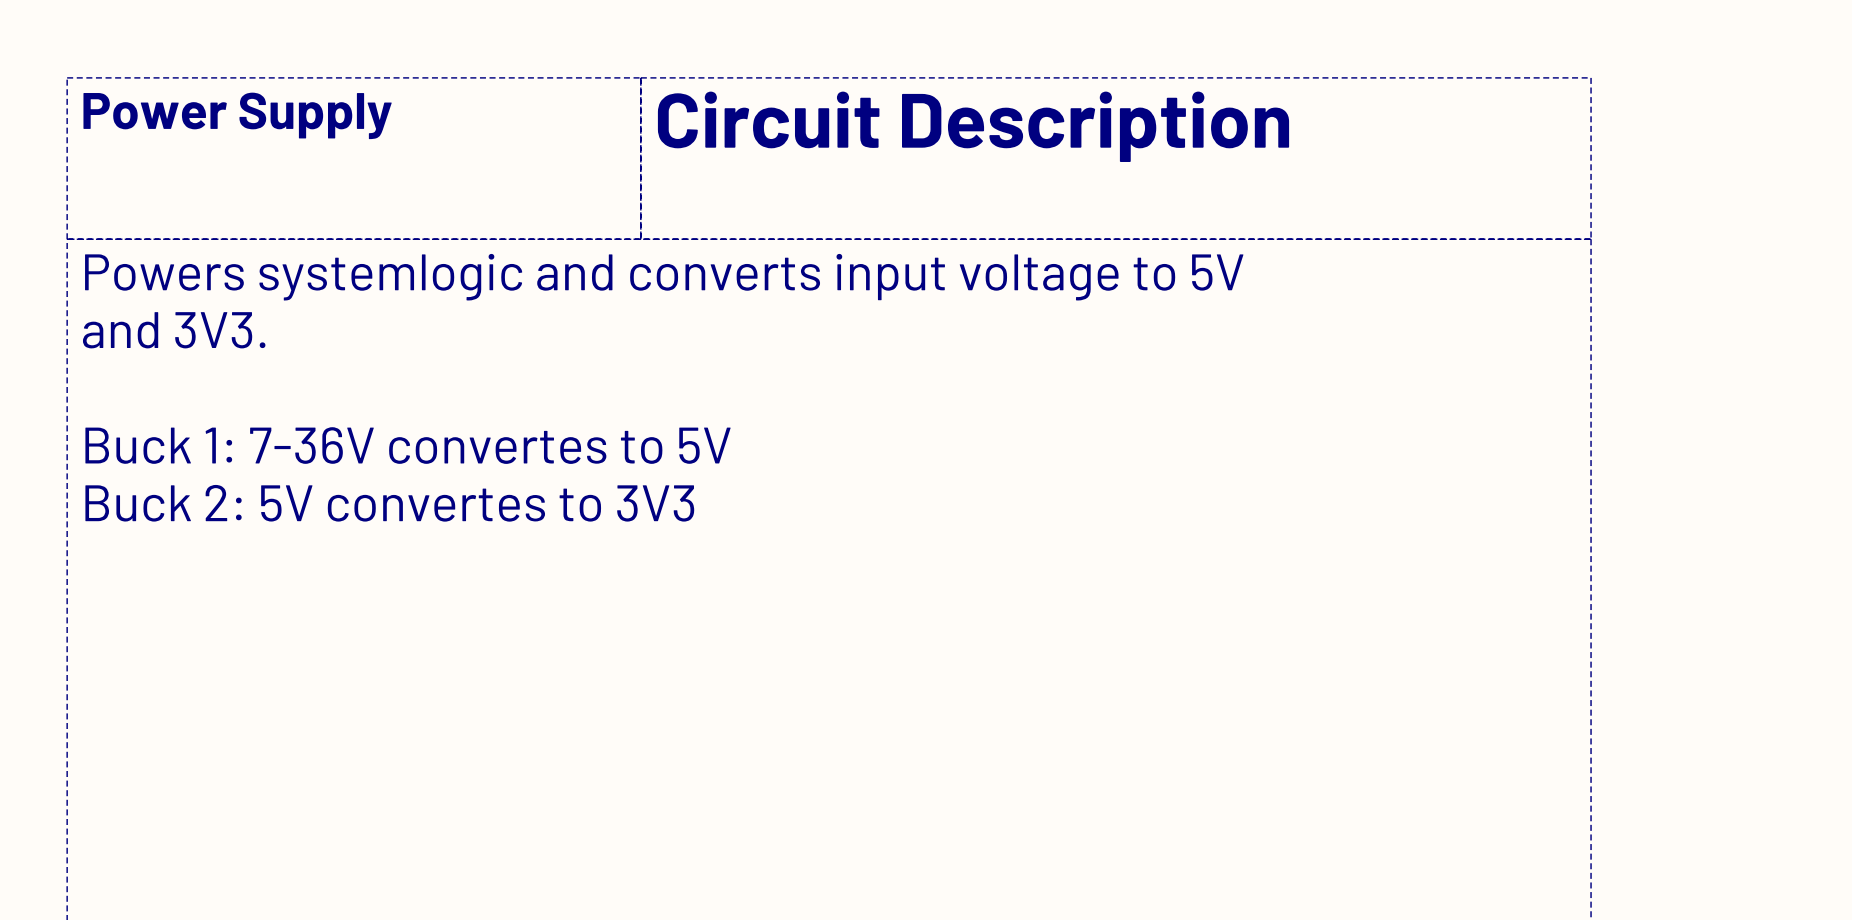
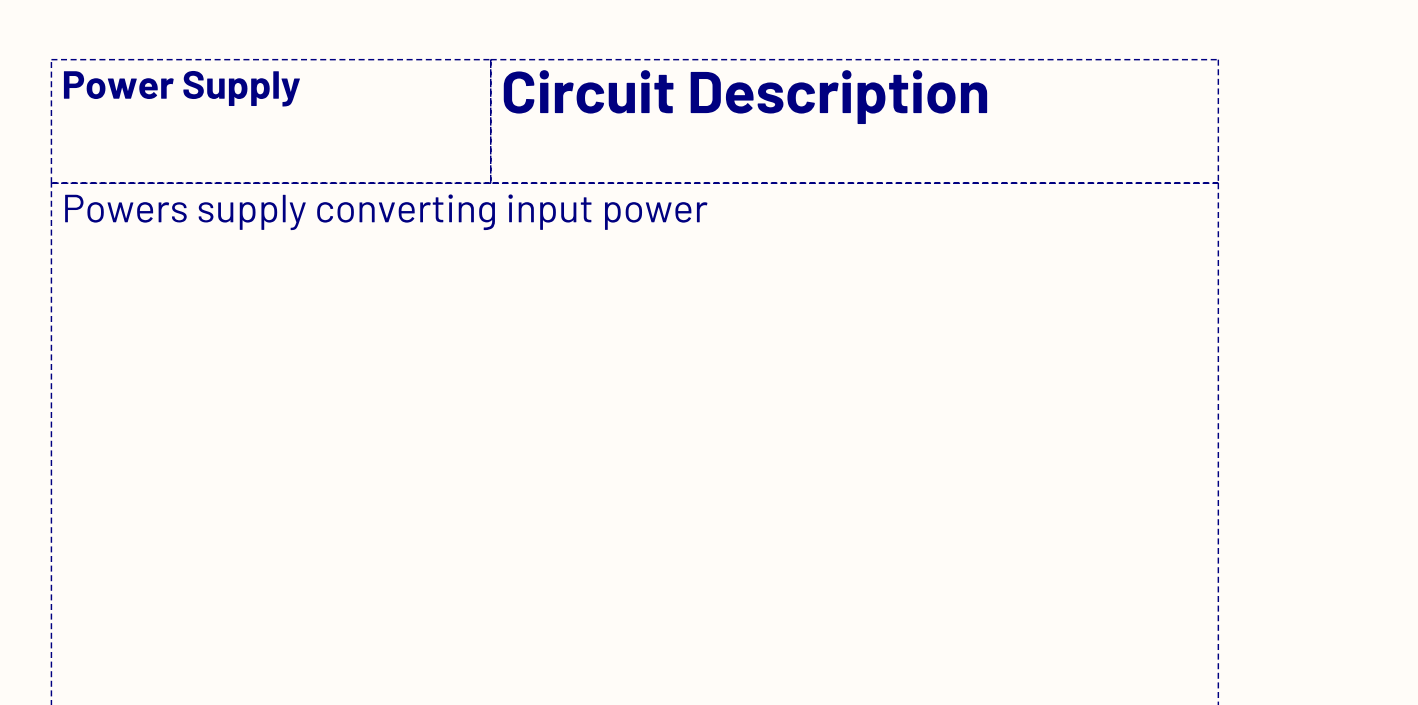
text: Powers systemlogic and converts input voltage to 5V (664, 277) -> Powers supply converting input power (386, 212)
text: and 3V3. (174, 330) -> none
text: Buck 1: 7-36V convertes to 5V (408, 445) -> none
text: Buck 2: 5V convertes to 3V3 (389, 503) -> none

